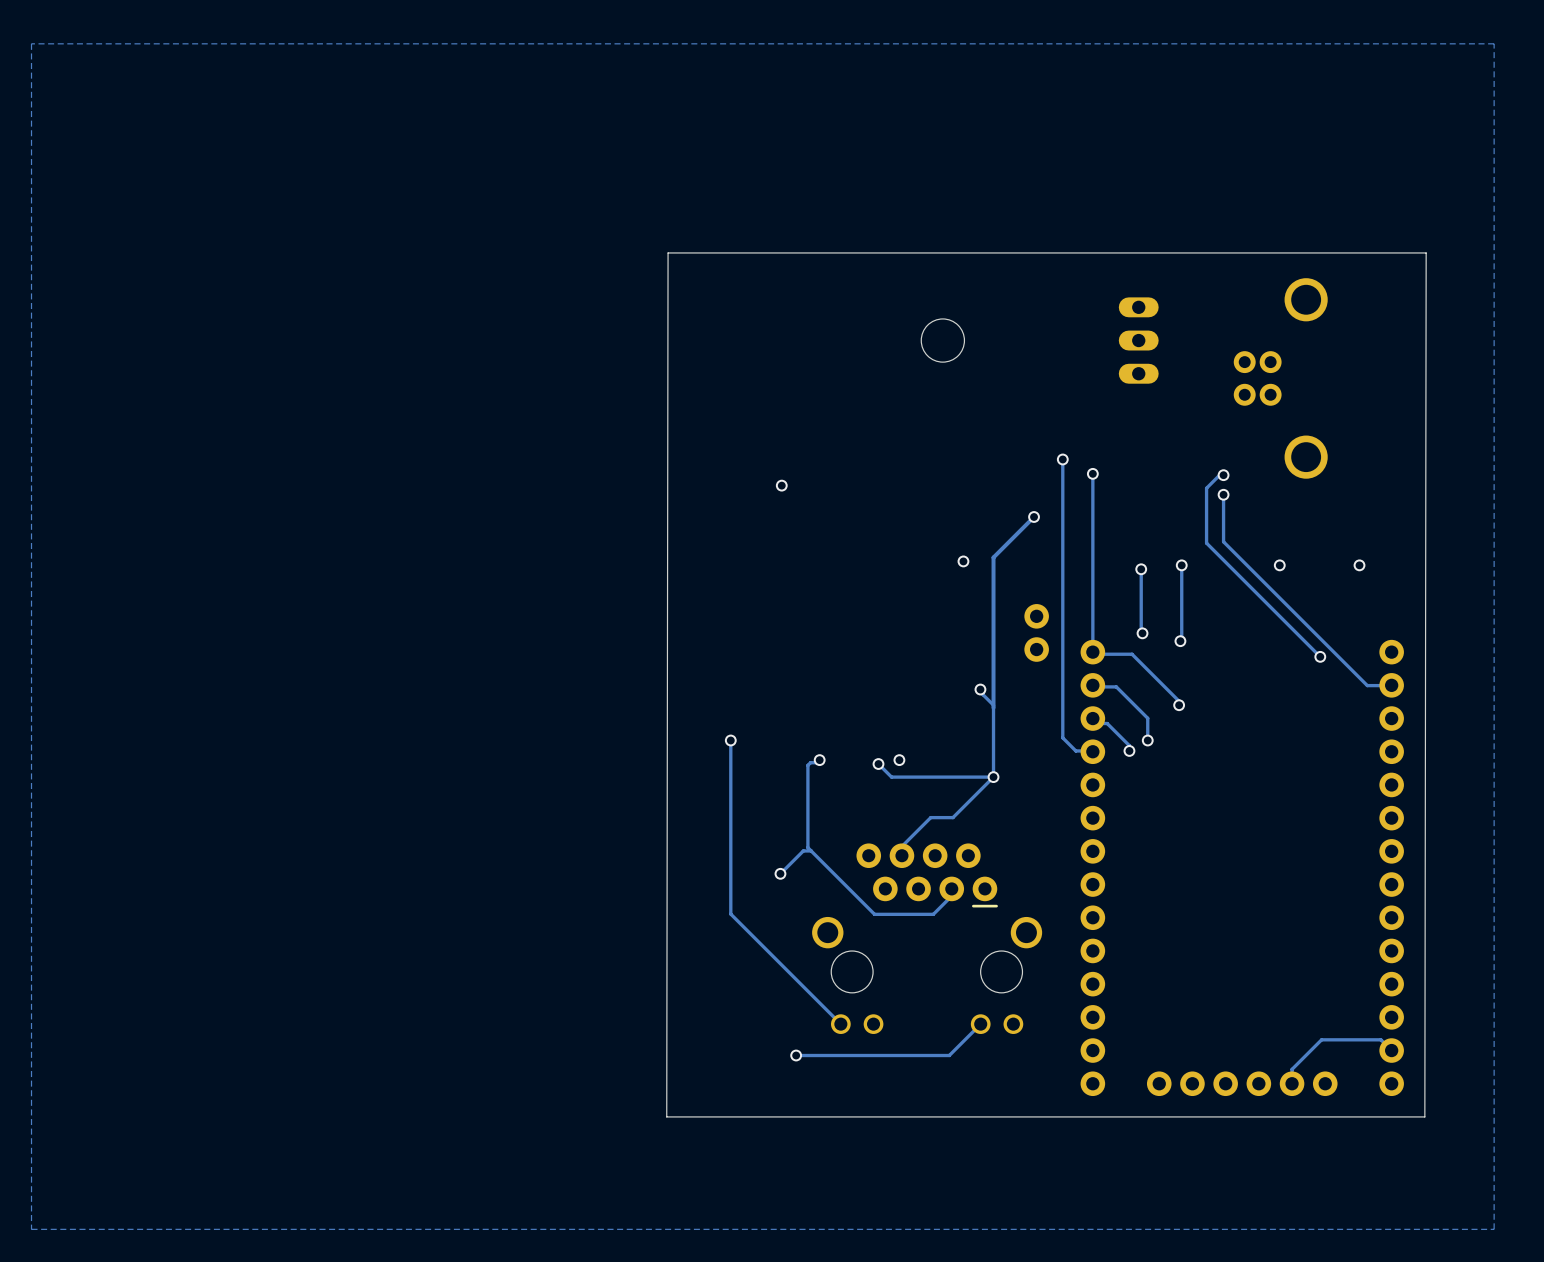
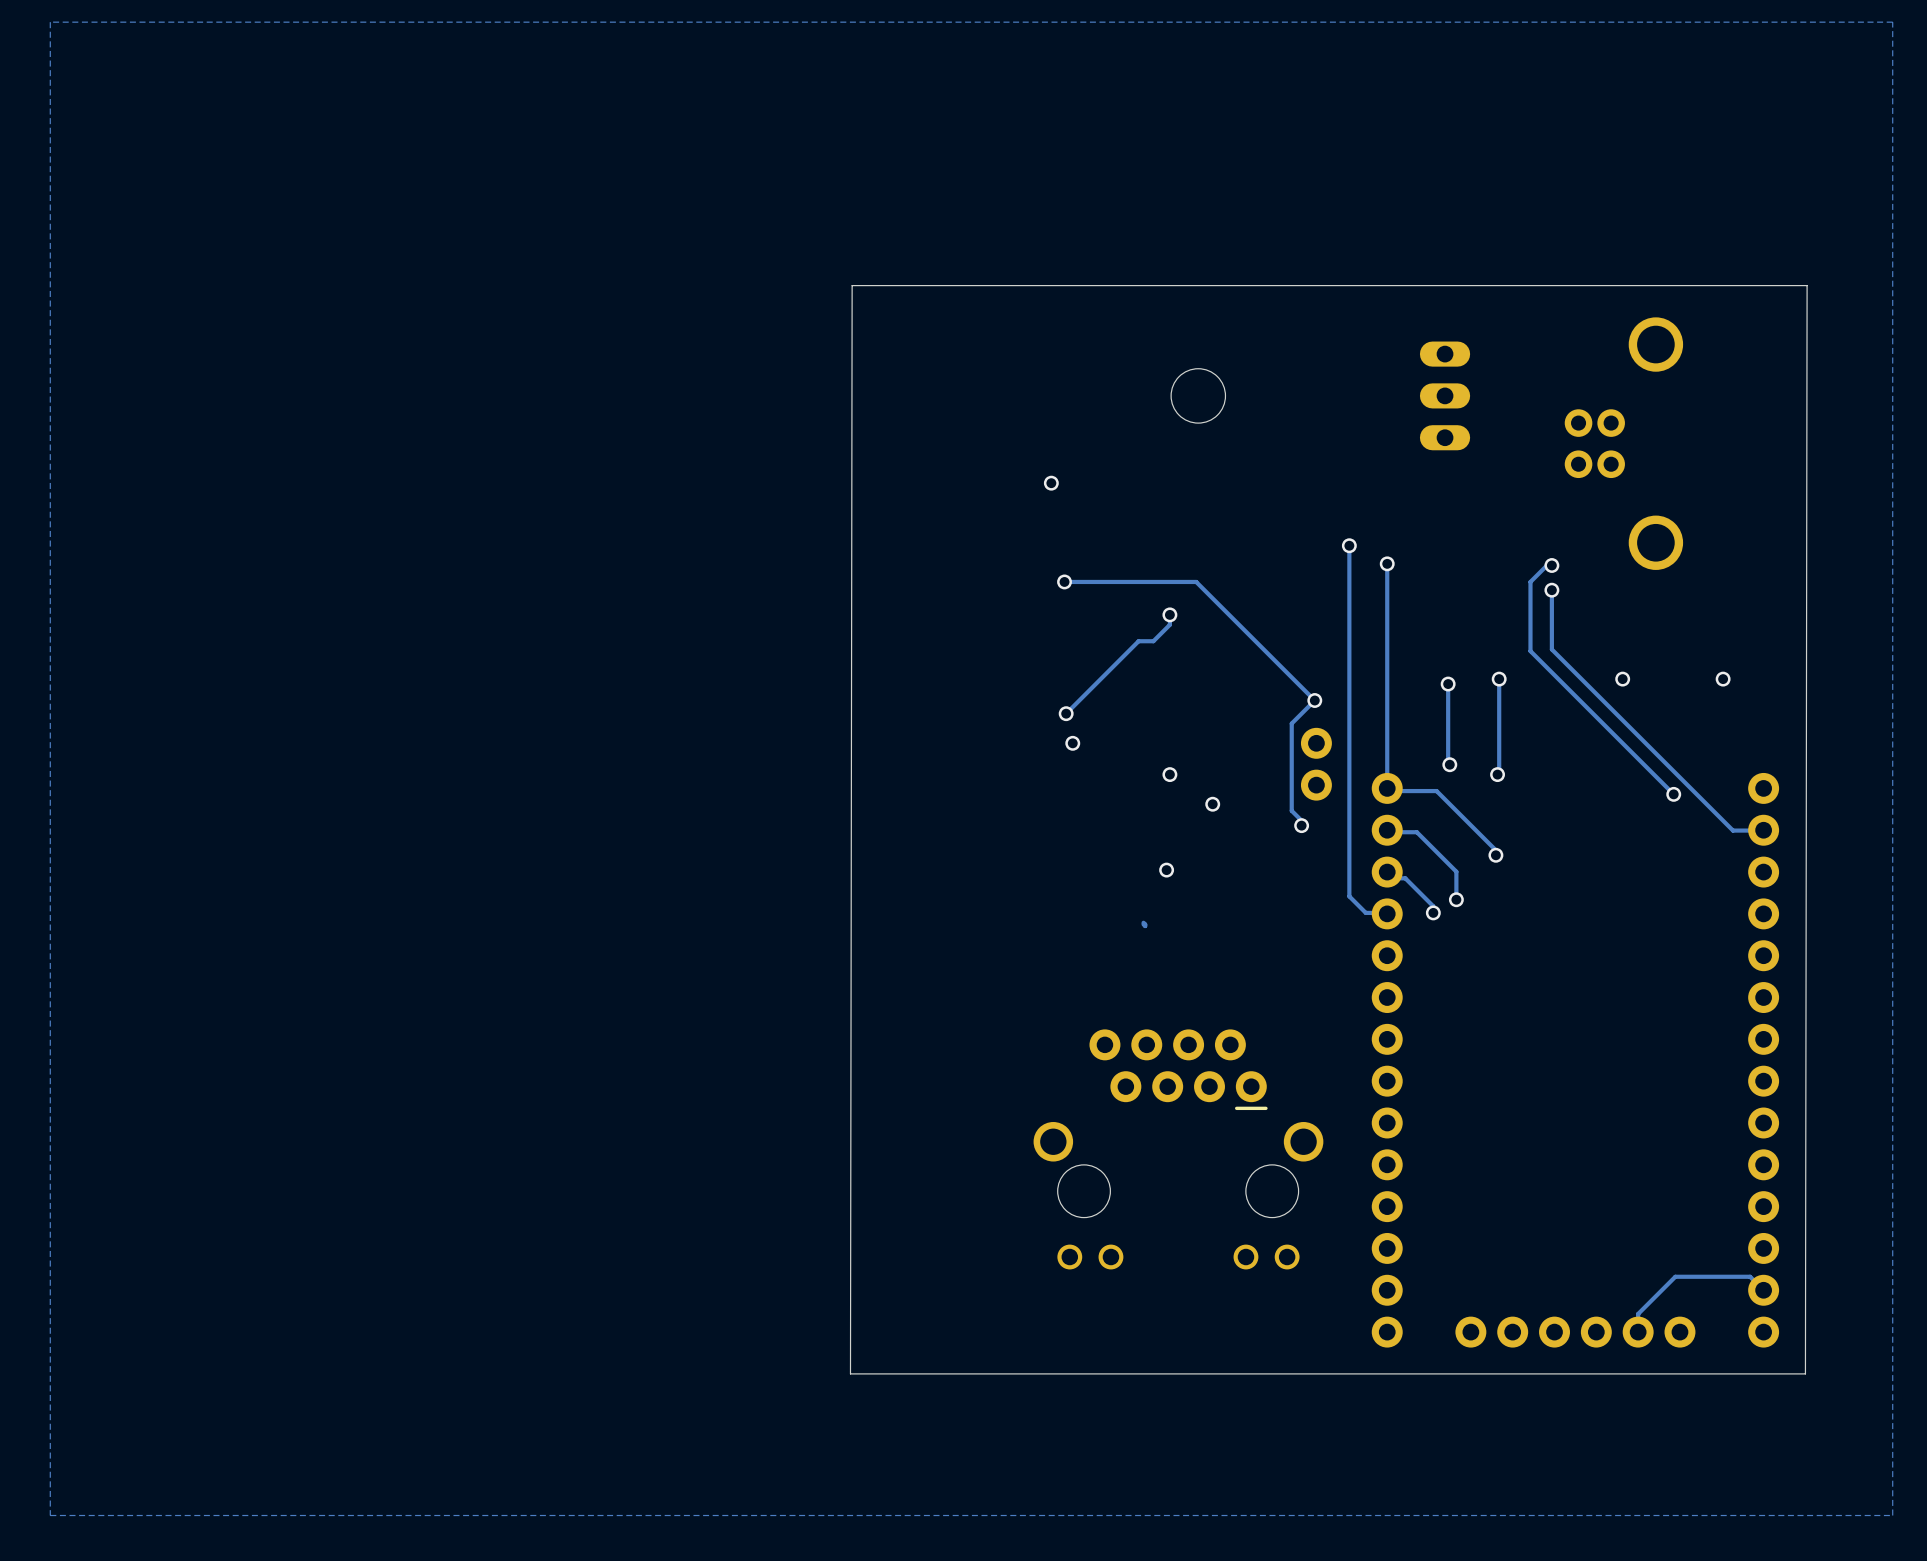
via: none -> (1051, 483)
via: (781, 485) -> none
track: none -> (1064, 581) (1196, 581) (1314, 700) (1291, 723) (1291, 810) (1301, 820) (1301, 825)
via: none -> (1064, 581)
track: none -> (1169, 614) (1169, 624) (1153, 641) (1138, 641) (1066, 713)
via: none -> (1169, 614)
track: (1034, 516) (993, 557) (993, 707) -> none
via: (1034, 516) -> none
via: (963, 561) -> none
via: none -> (1314, 700)
via: none -> (1066, 713)
via: none -> (1072, 743)
via: none -> (1169, 774)
via: none -> (1212, 804)
via: none -> (1301, 825)
track: (980, 689) (993, 705) (993, 777) -> none
via: (980, 689) -> none
via: none -> (1166, 870)
track: (730, 740) (730, 914) (840, 1024) -> none
via: (730, 740) -> none
track: (819, 760) (807, 765) (807, 847) (874, 914) (933, 914) (951, 895) (951, 888) -> none
via: (819, 760) -> none
via: (899, 760) -> none
track: (878, 764) (891, 777) (993, 777) -> none
via: (878, 764) -> none
track: (993, 777) (953, 817) (930, 817) (901, 846) (901, 855) -> none
via: (993, 777) -> none
track: (811, 850) (803, 850) (780, 873) -> none
via: (780, 873) -> none
track: (980, 1024) (949, 1055) (796, 1055) -> none
via: (796, 1055) -> none

